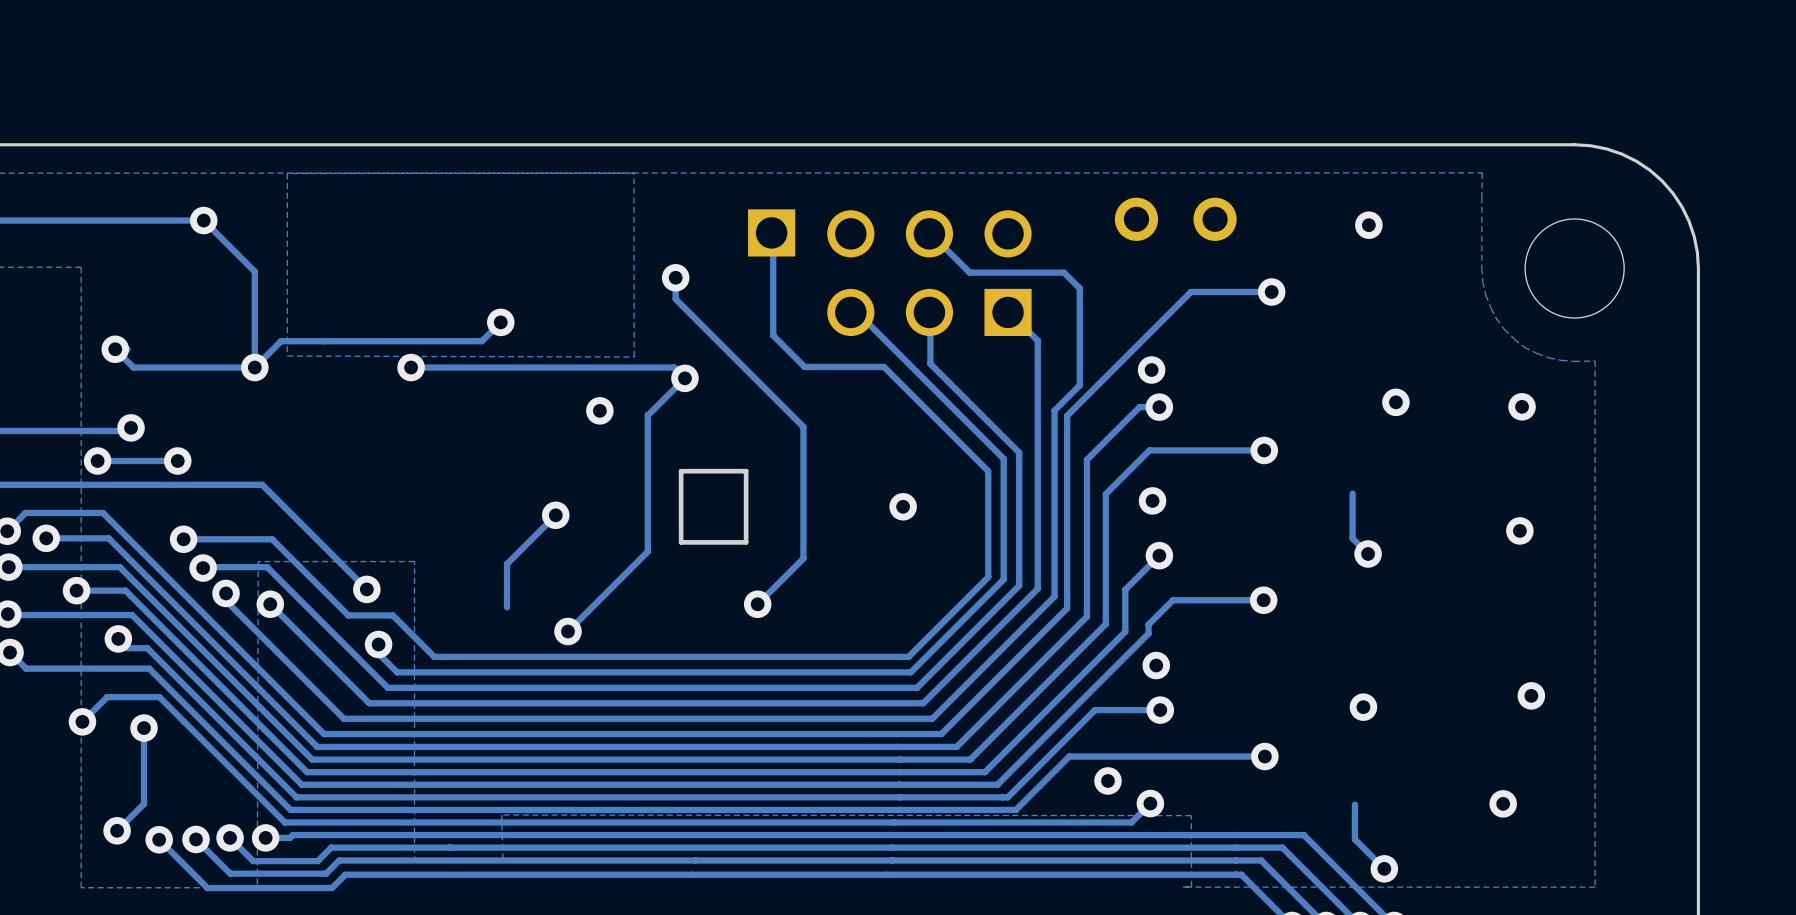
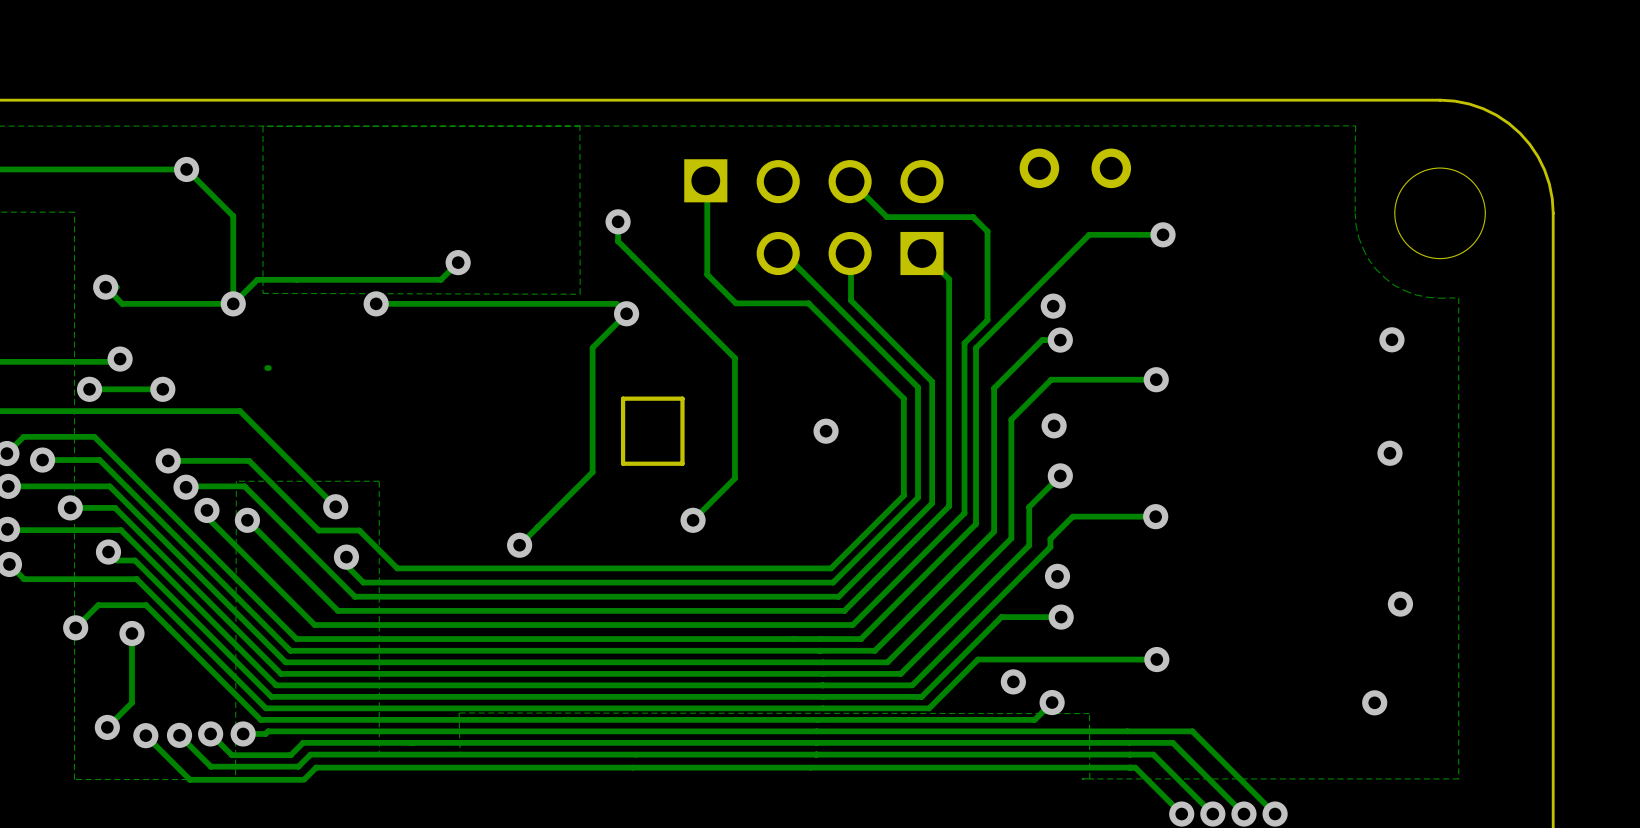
via: (1368, 225) -> none
via: (1395, 402) -> none
via: (599, 410) -> none
track: none -> (268, 368) (267, 368)
track: (1352, 493) (1352, 538) (1368, 553) -> none
track: (555, 515) (507, 564) (507, 607) -> none
via: (555, 515) -> none
via: (1368, 553) -> none
via: (1363, 707) -> none
track: (1354, 804) (1354, 839) (1384, 868) -> none
via: (1384, 868) -> none

